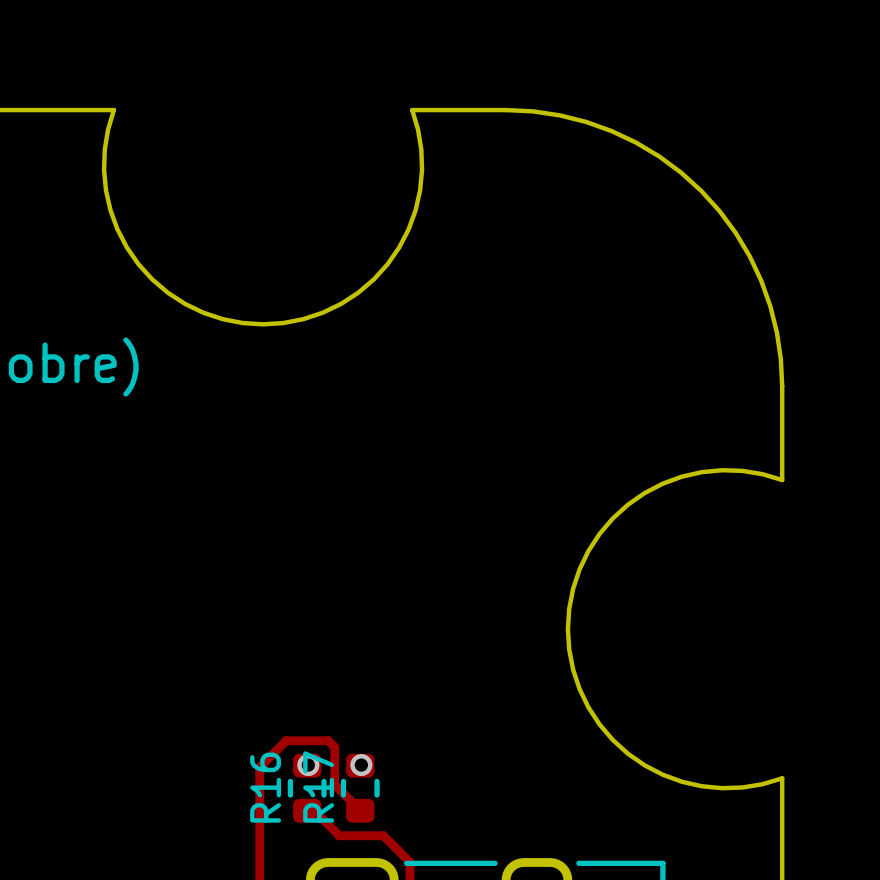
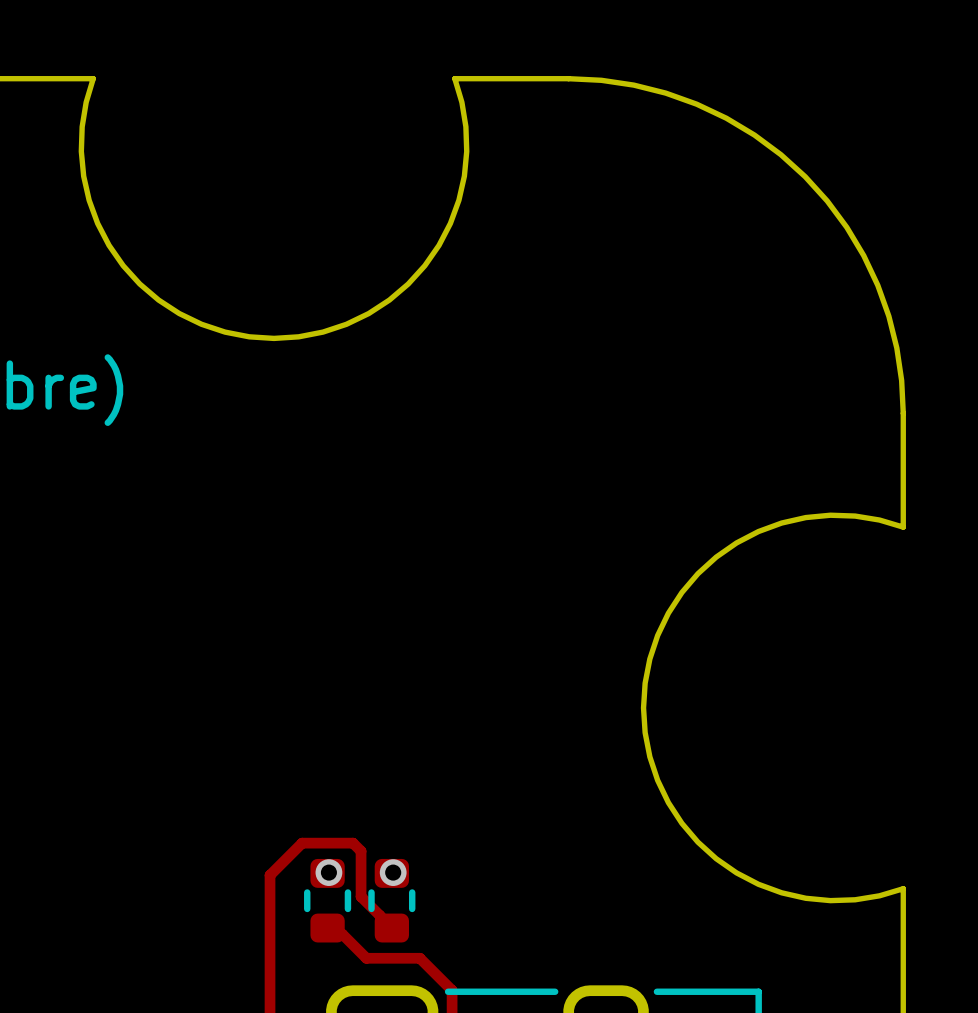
R17 name: R17 (318, 786) -> none
R16 name: R16 (265, 787) -> none

